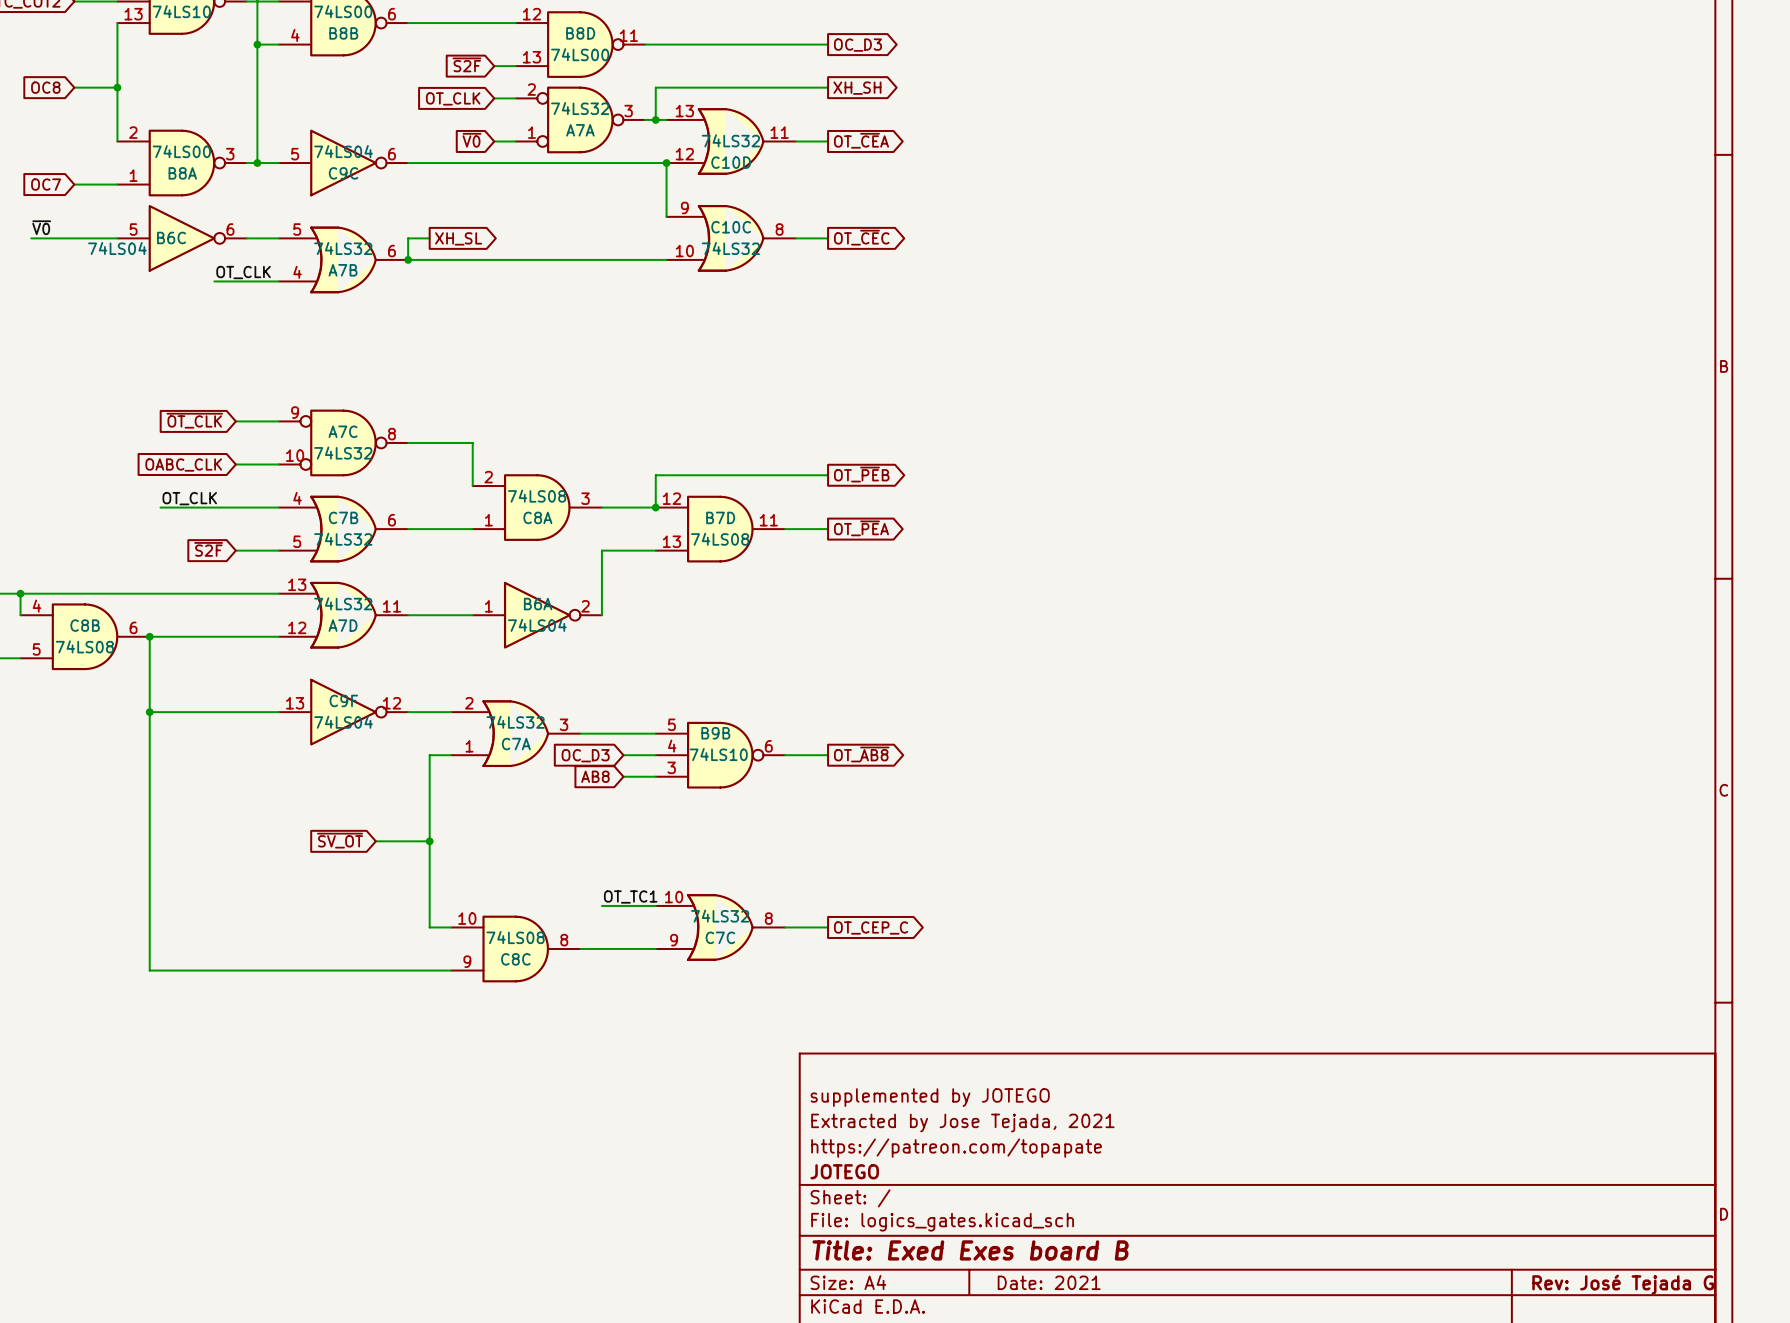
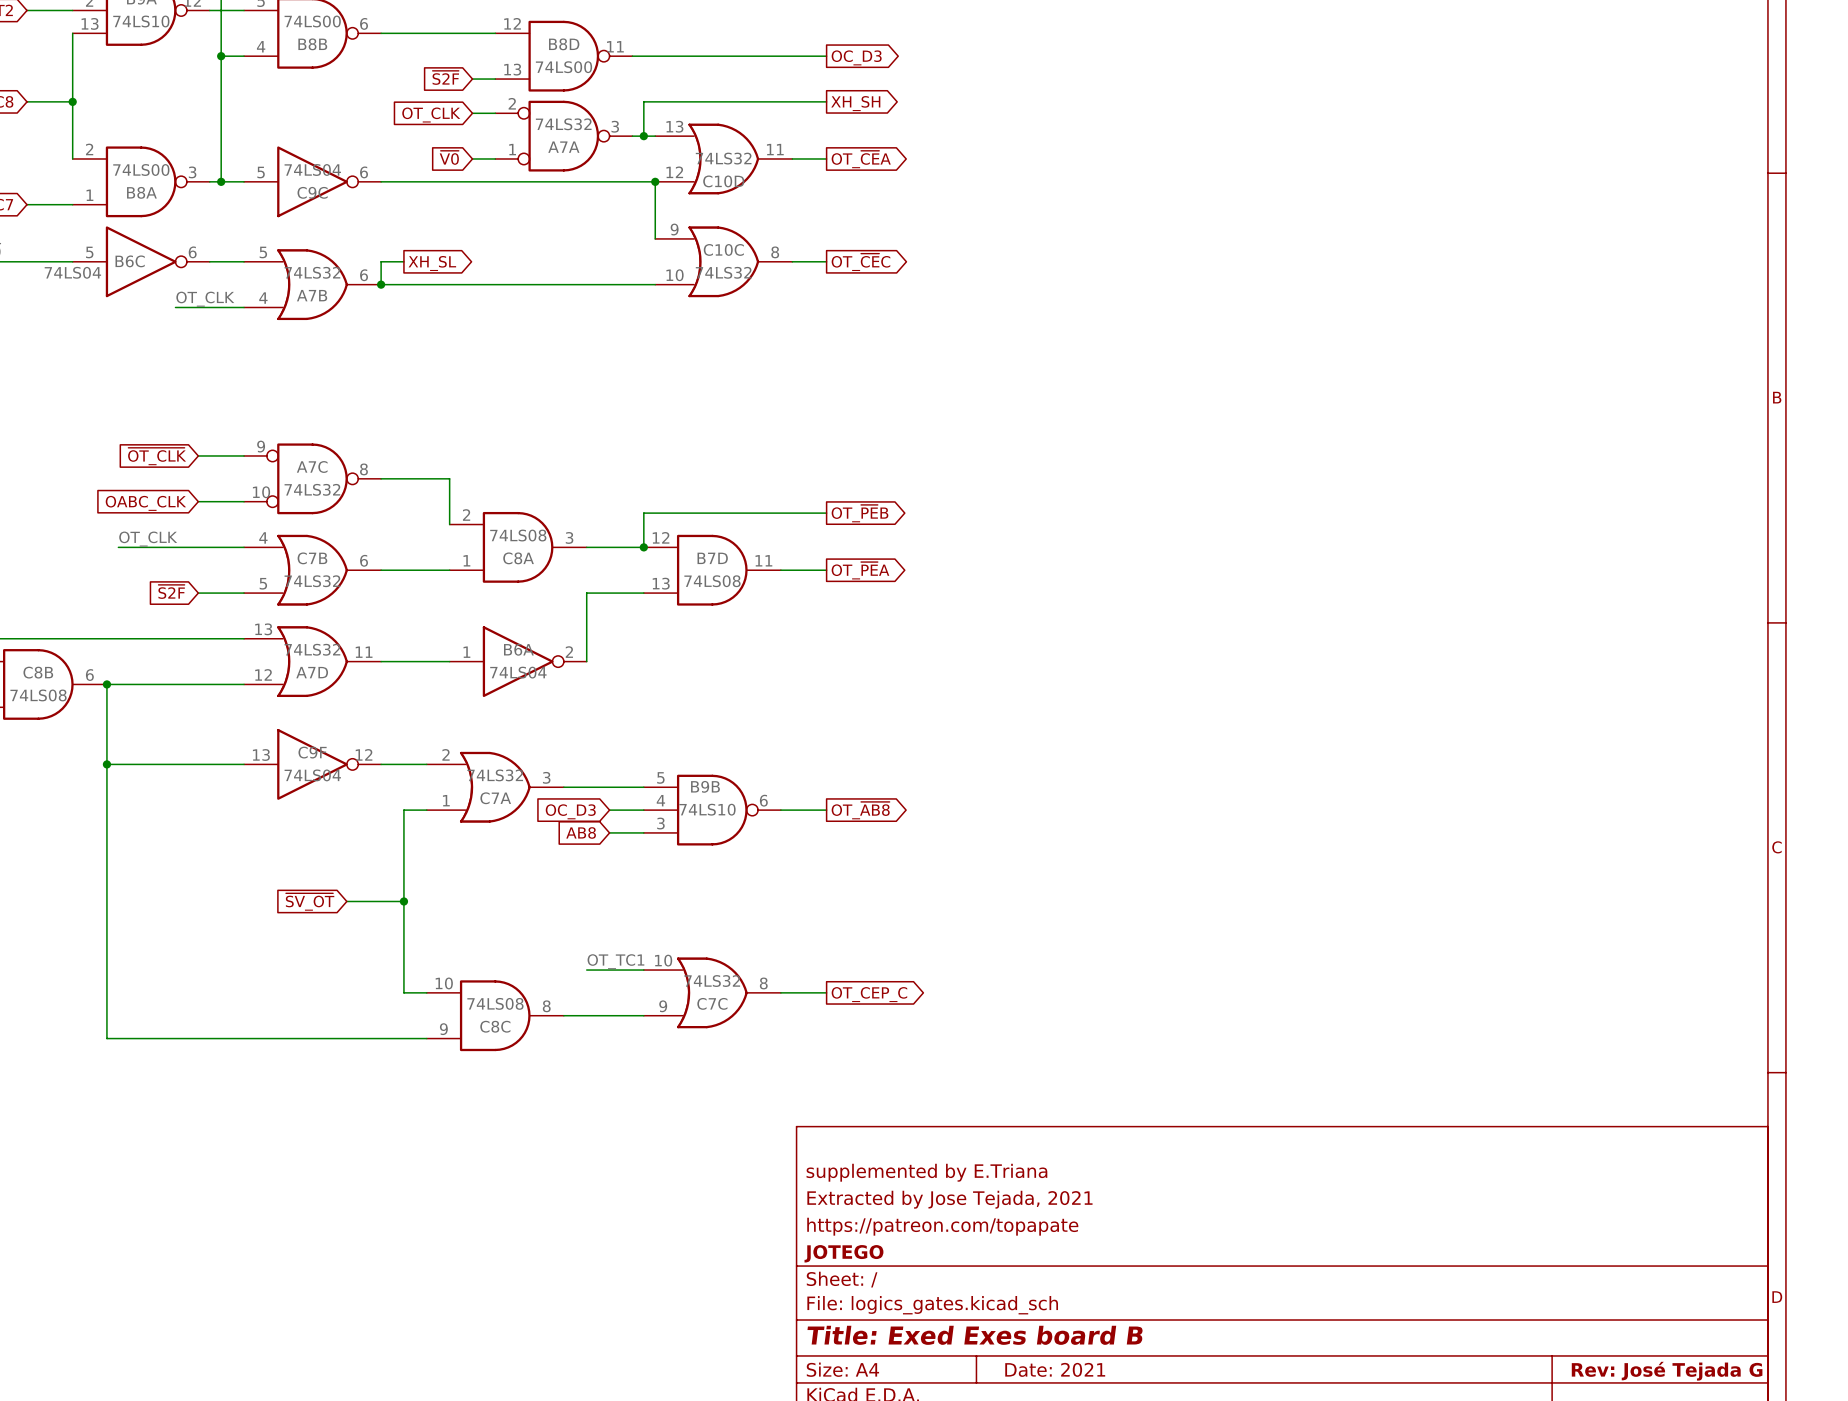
title block: supplemented by JOTEGO (930, 1097) -> supplemented by E.Triana (926, 1172)

